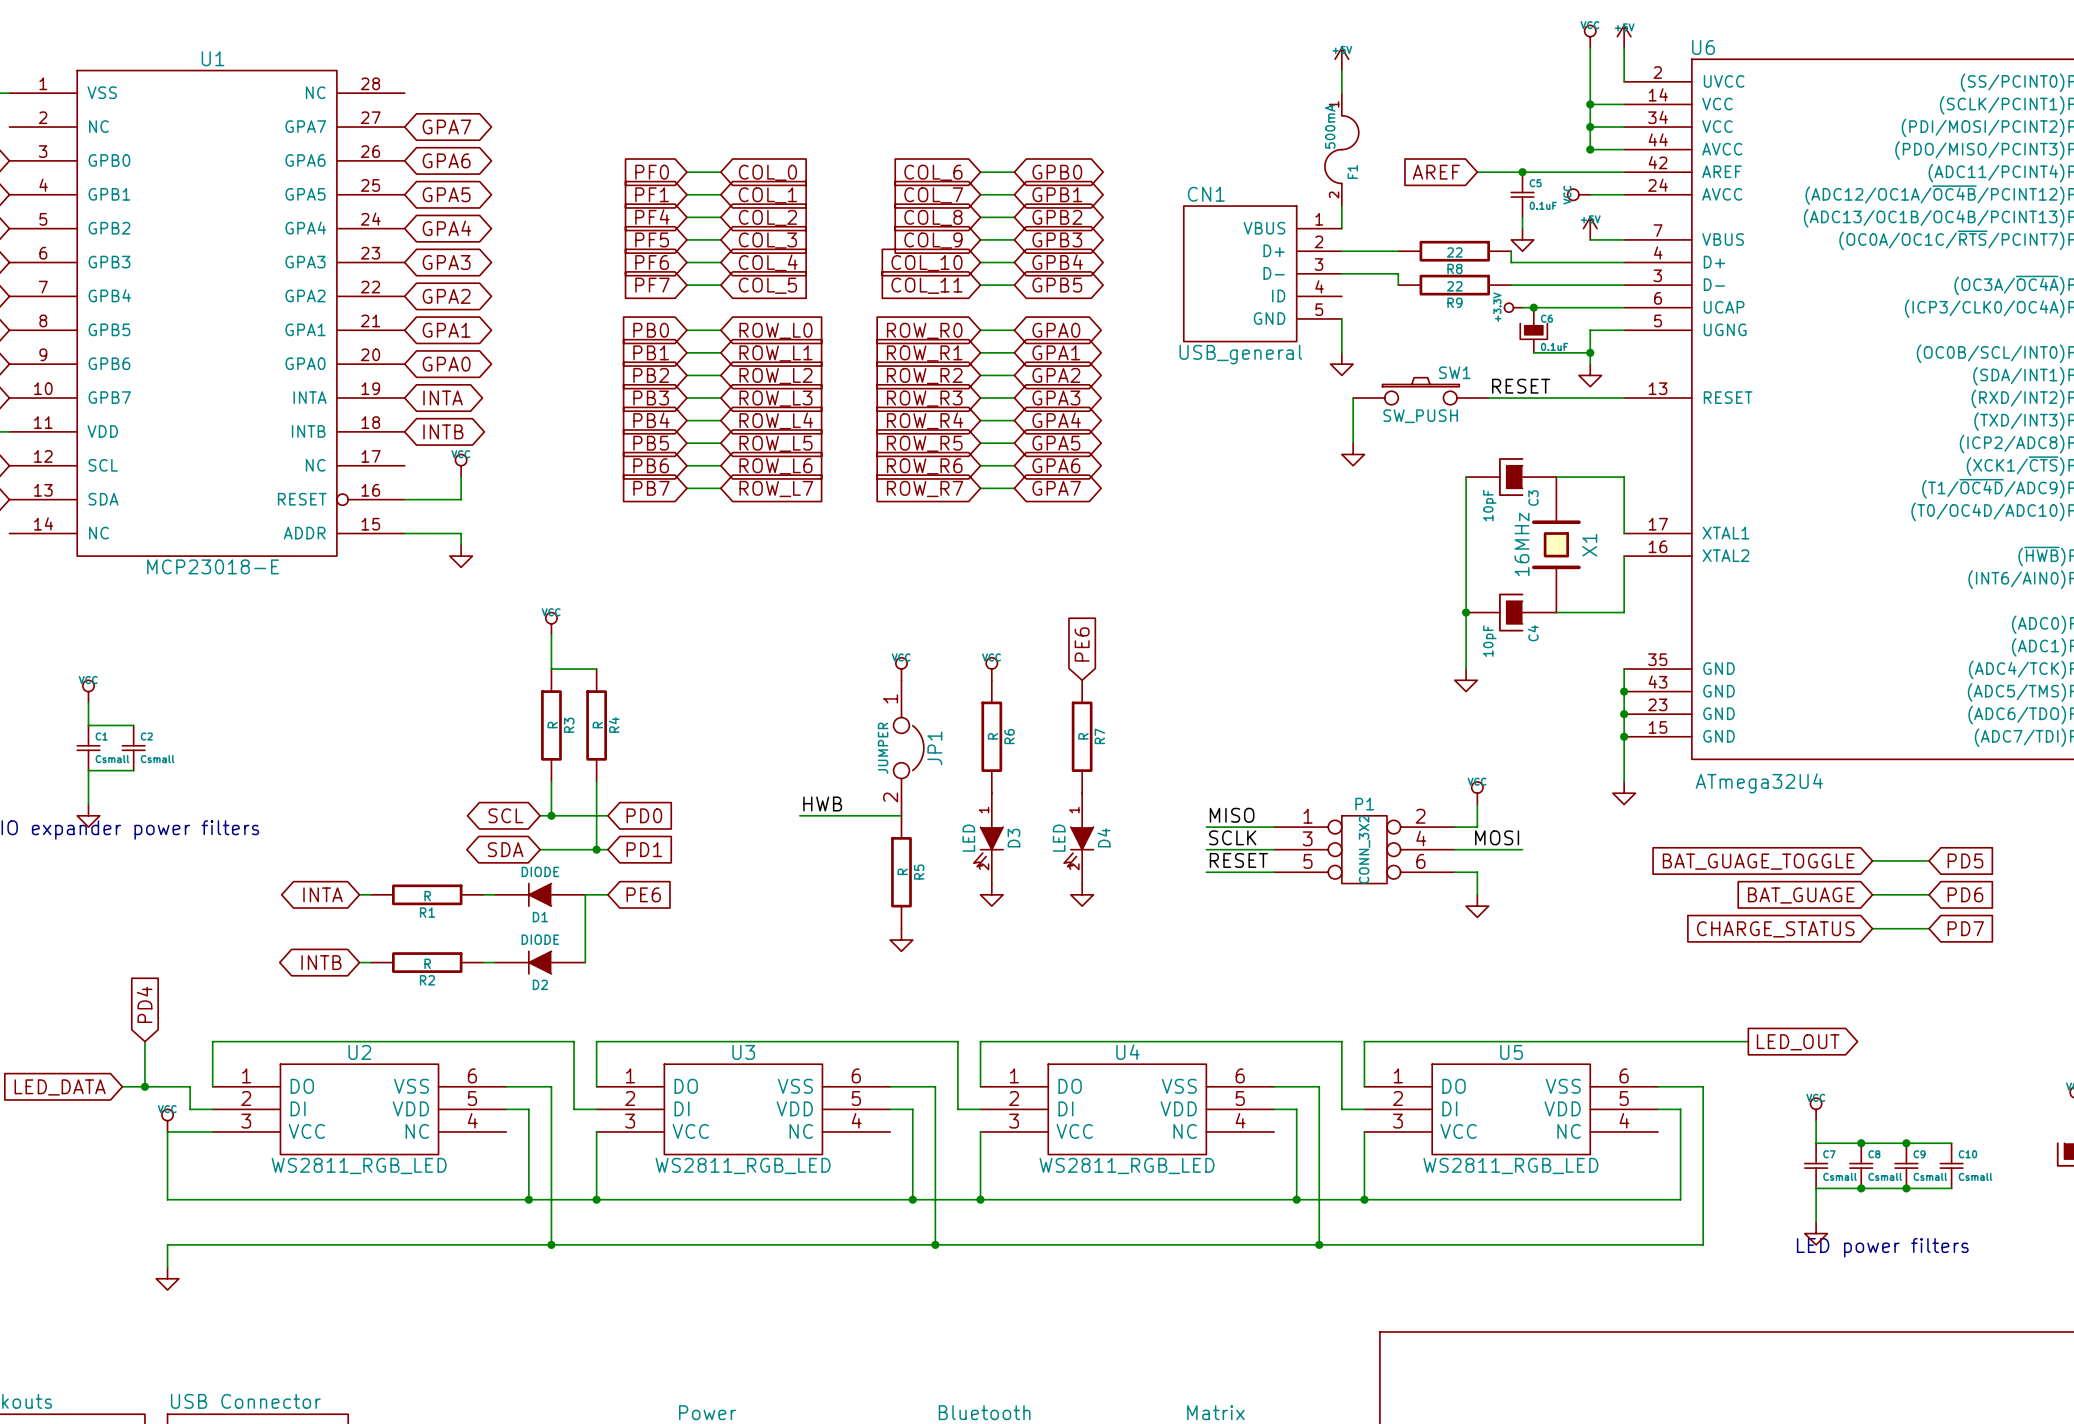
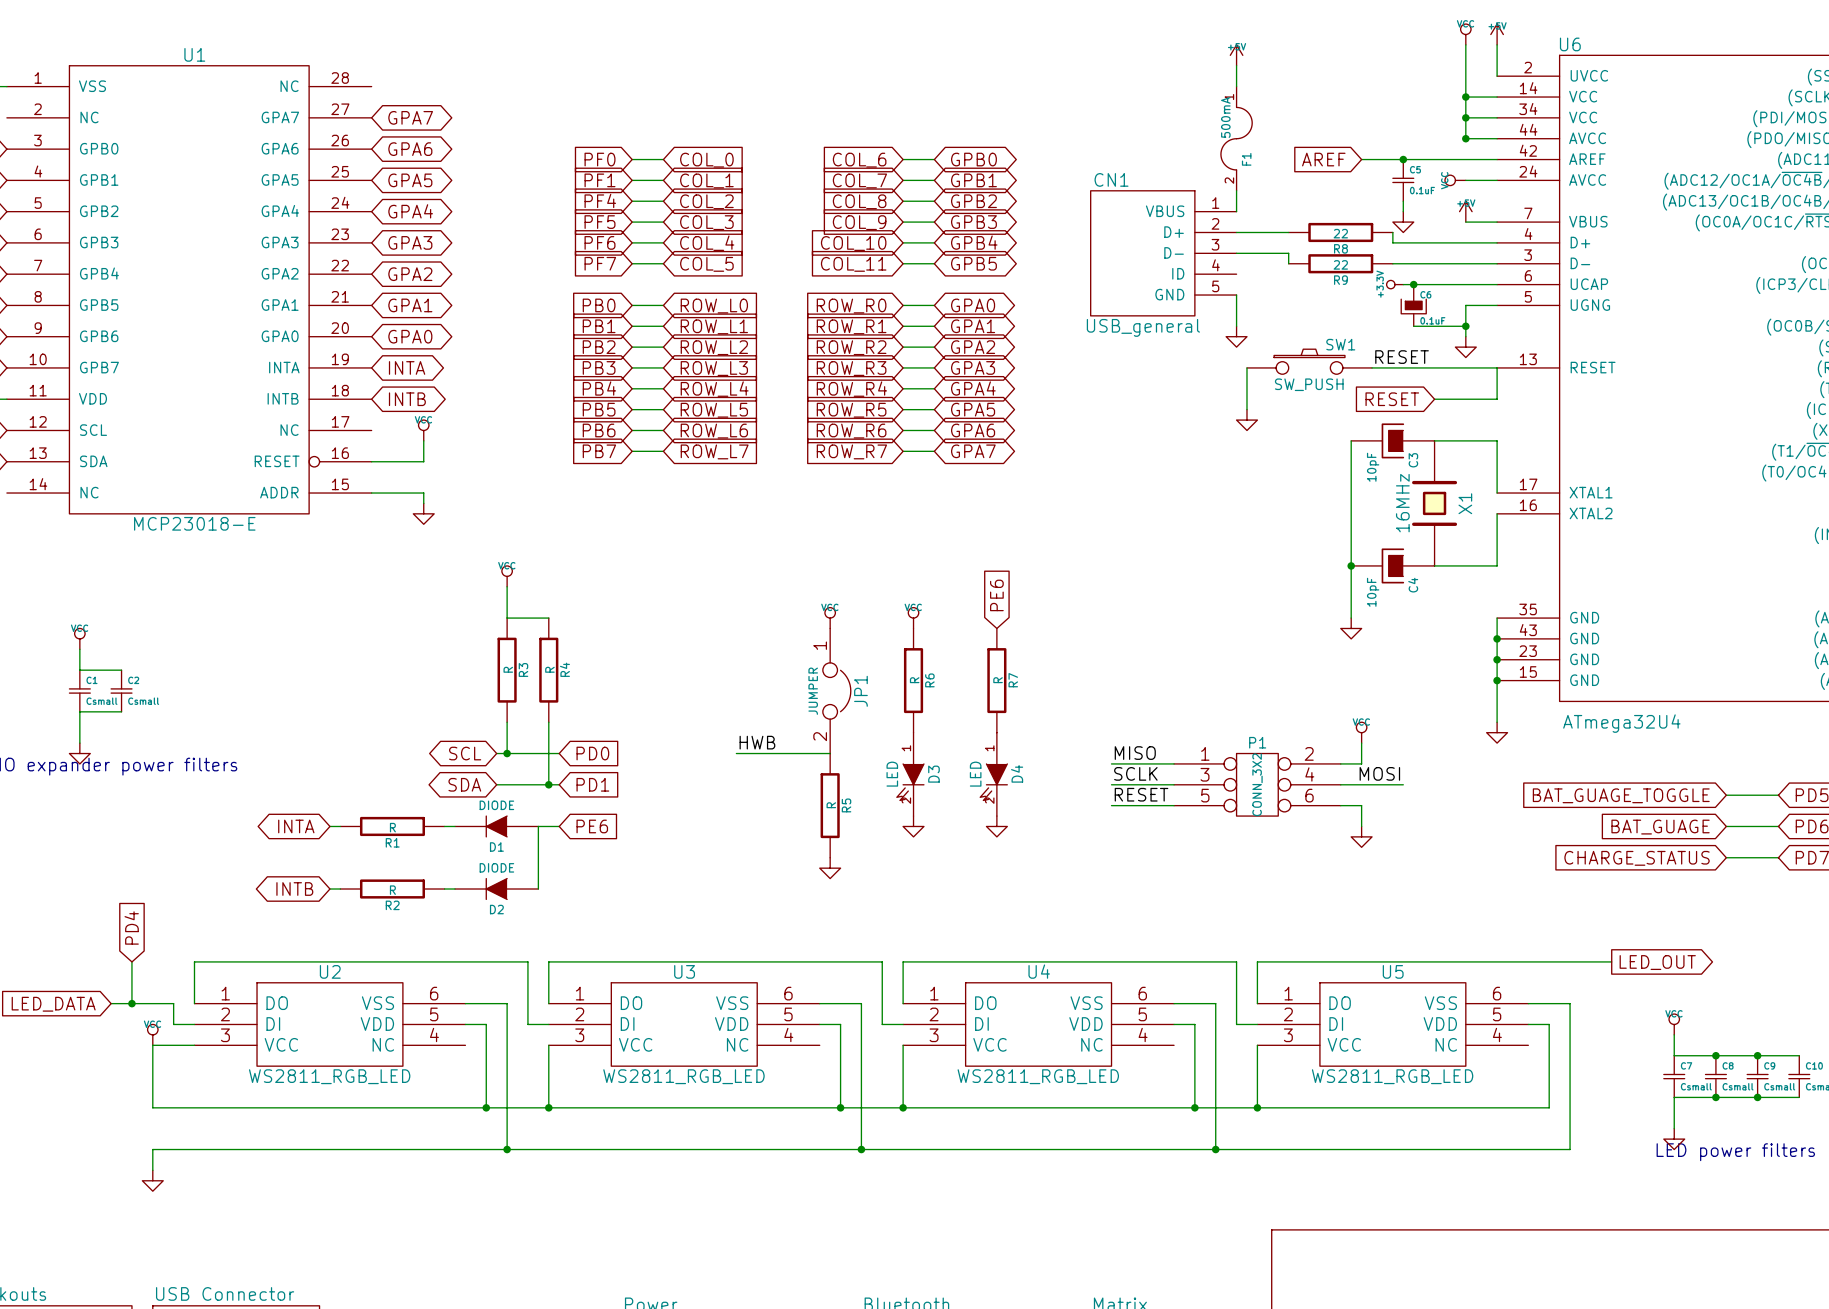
wire: none -> (1497, 367) (1497, 399) (1434, 399)
global label: none -> RESET (1392, 399)

